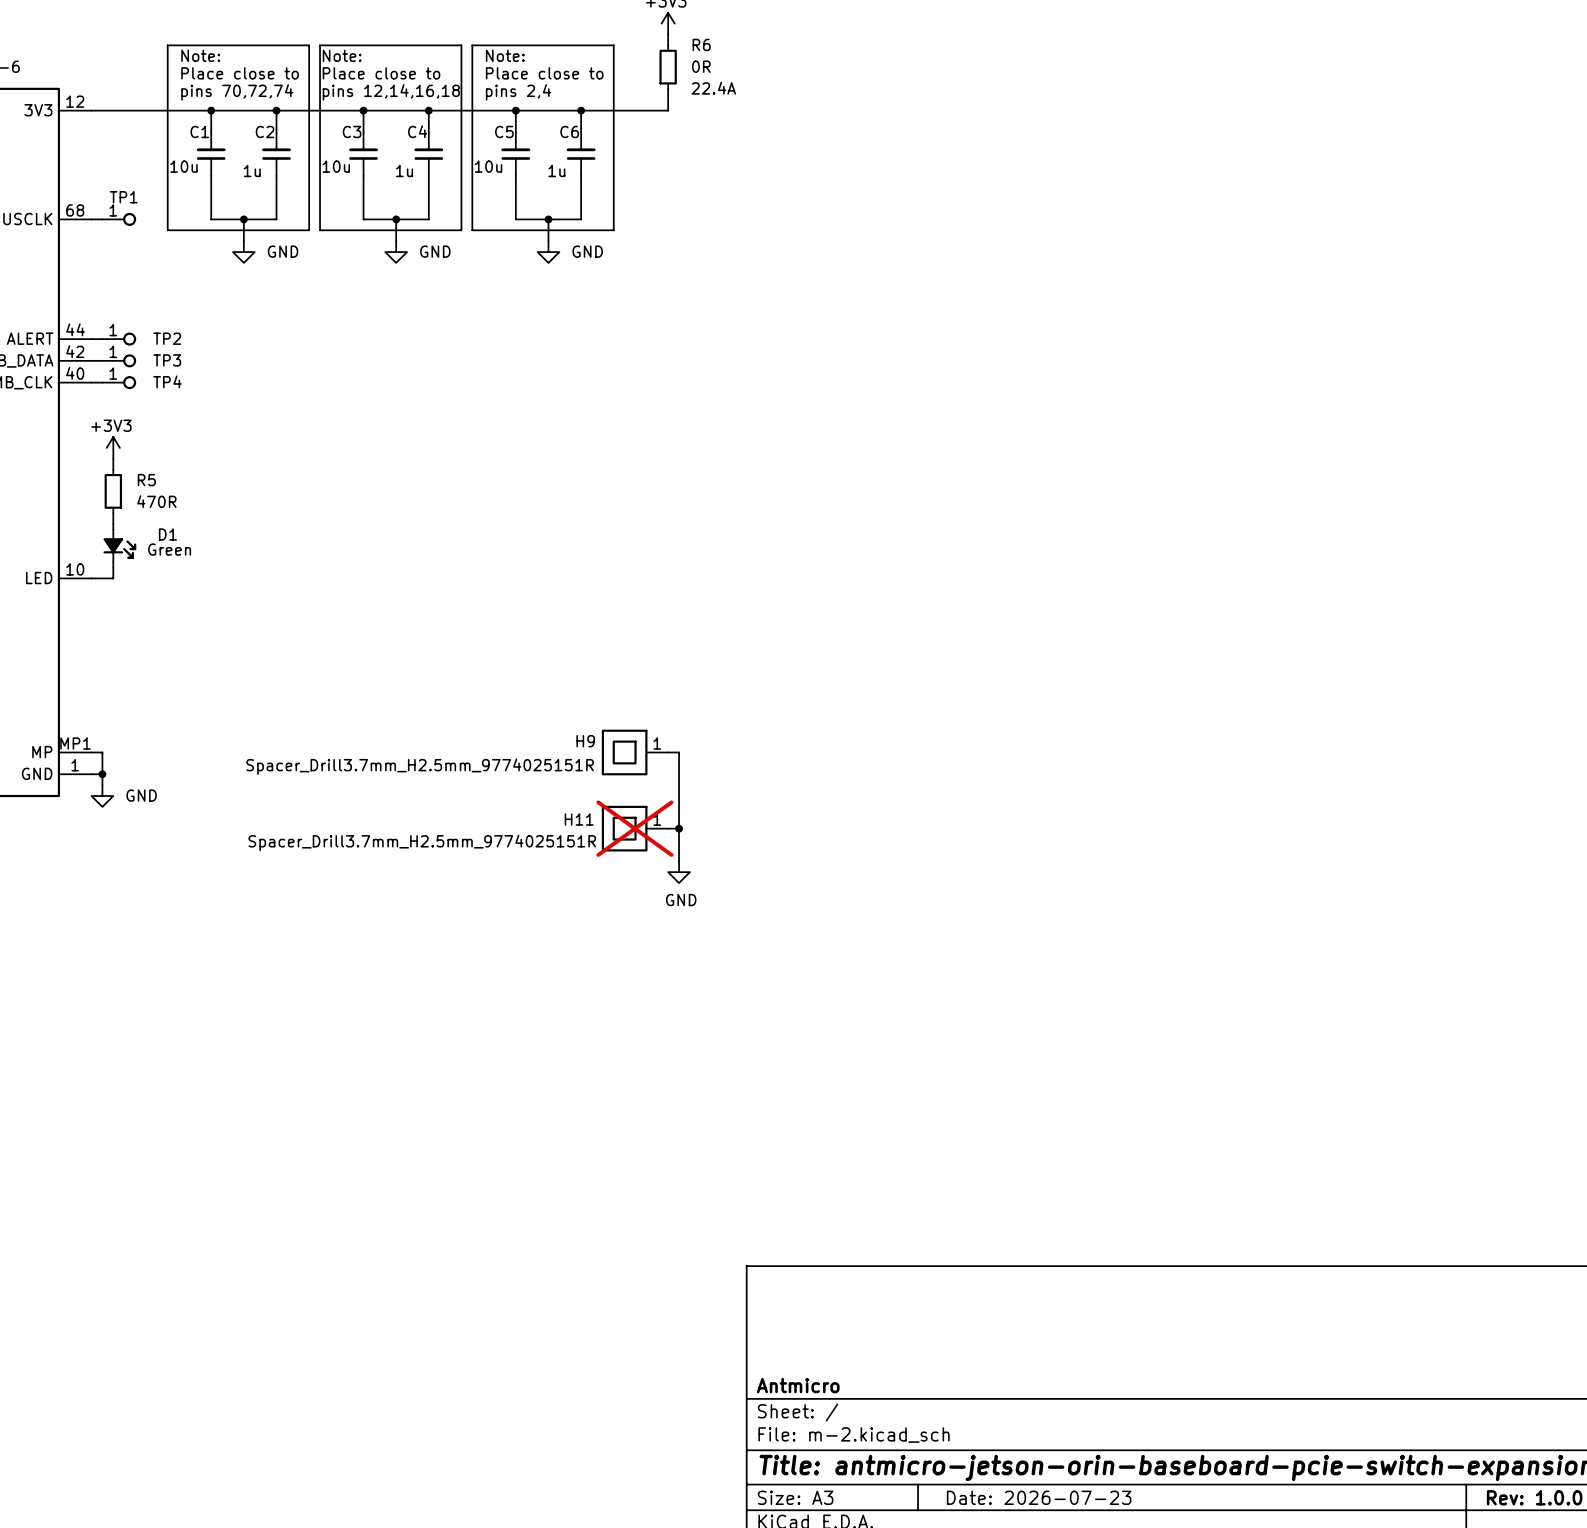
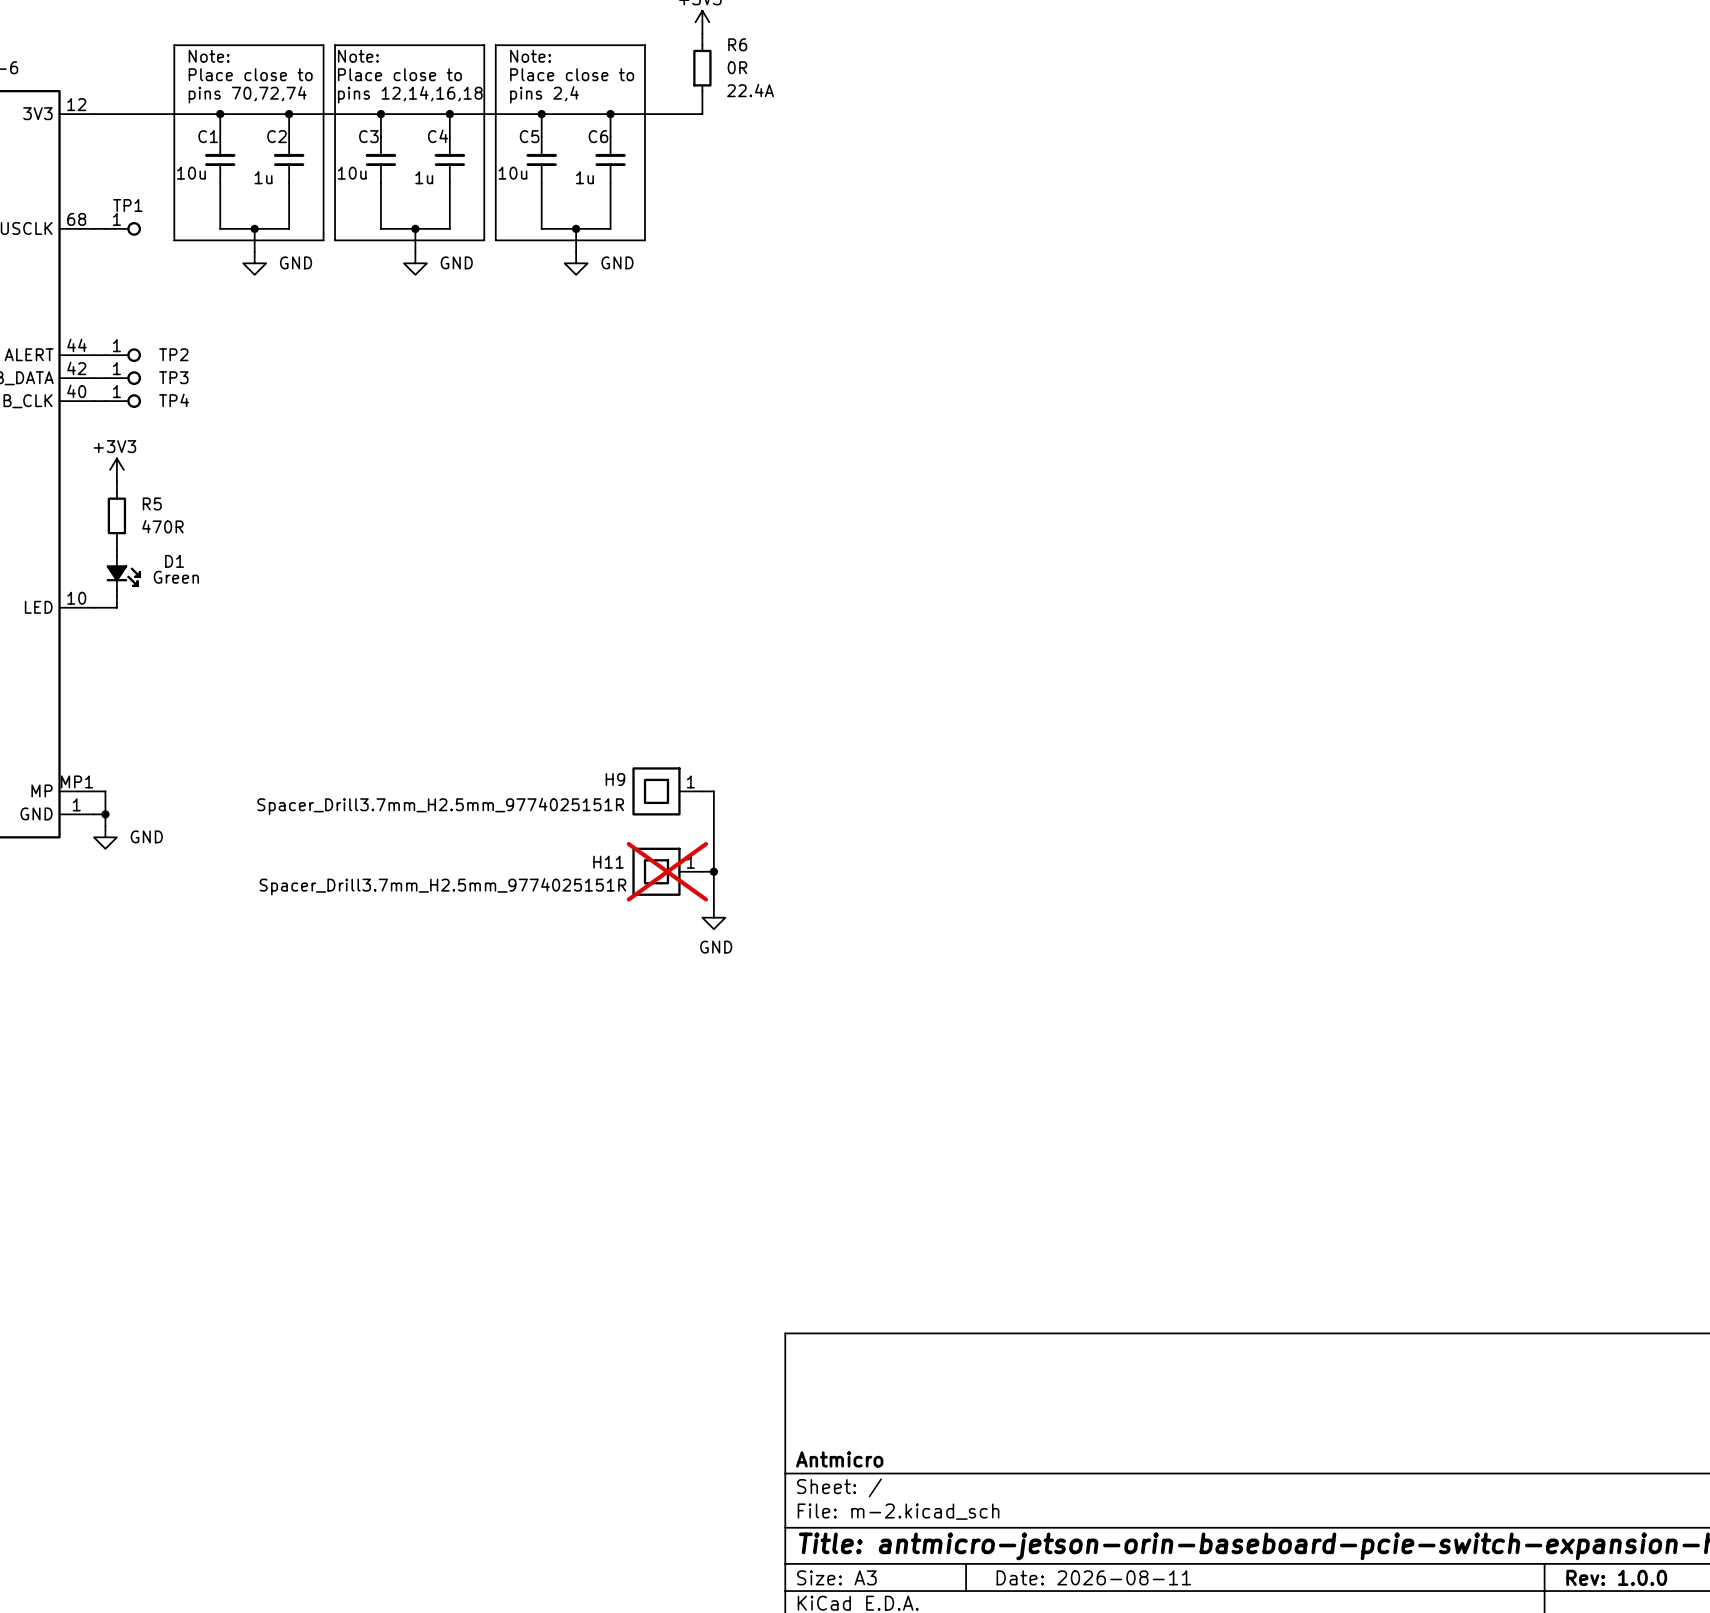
title block: Date: 2026-07-23 (1039, 1497) -> Date: 2026-08-11 (1093, 1577)

